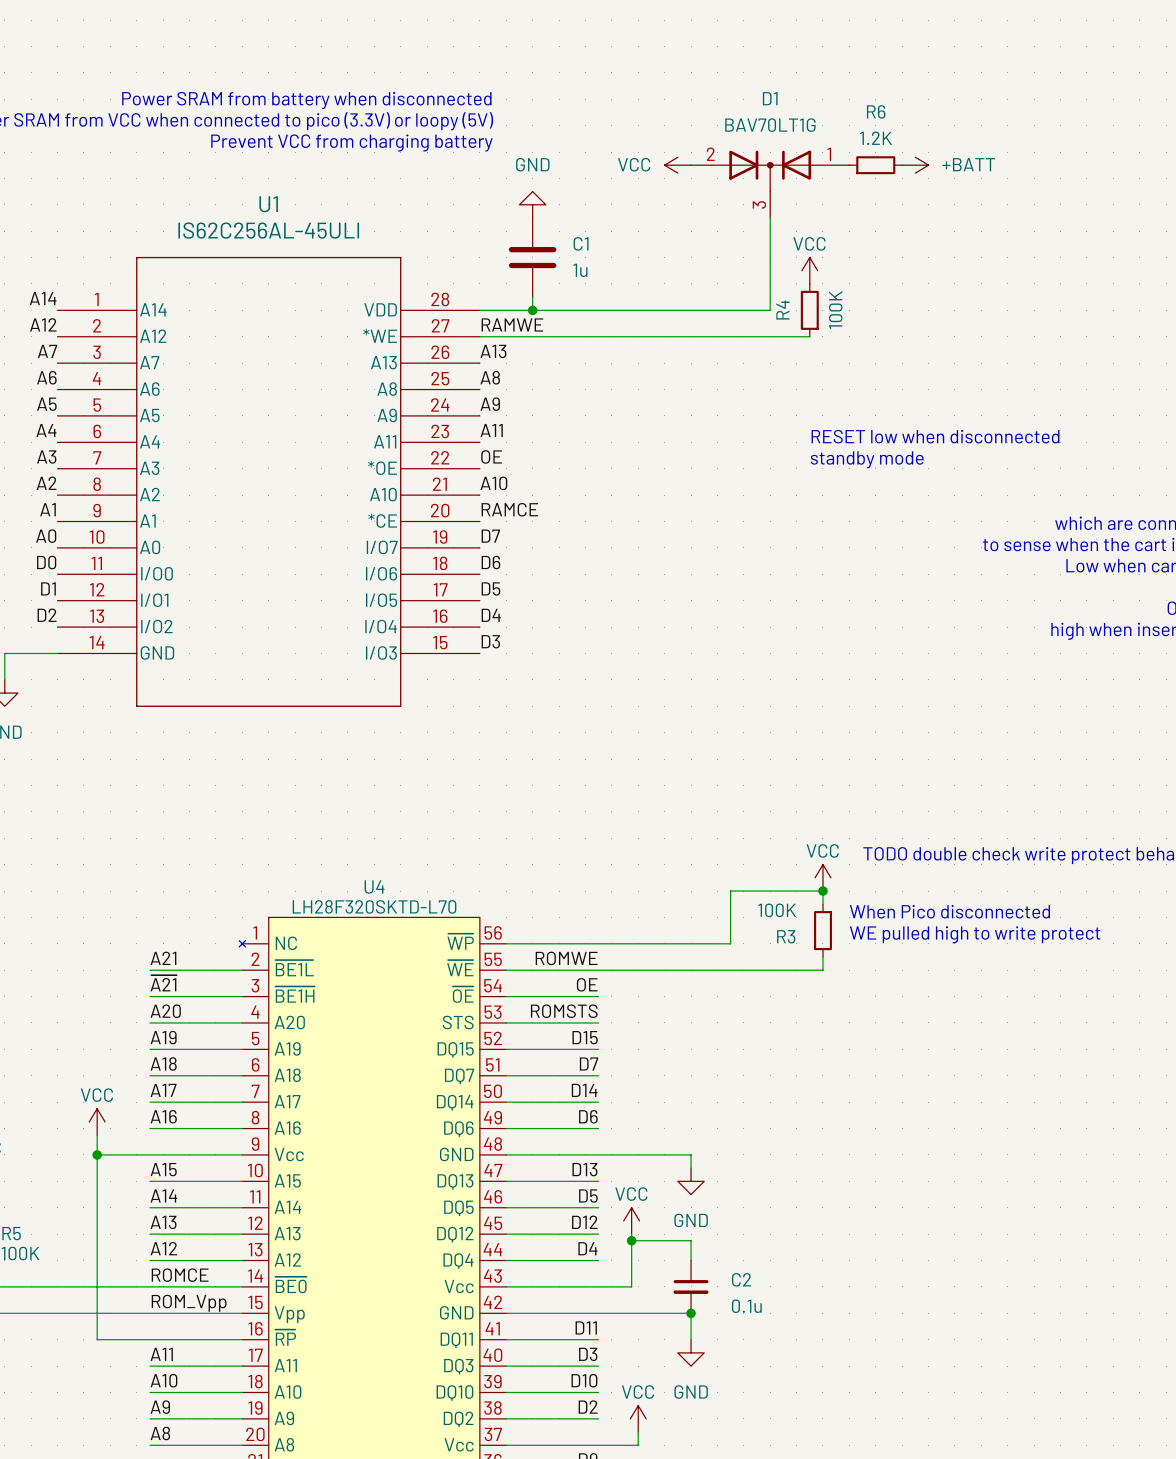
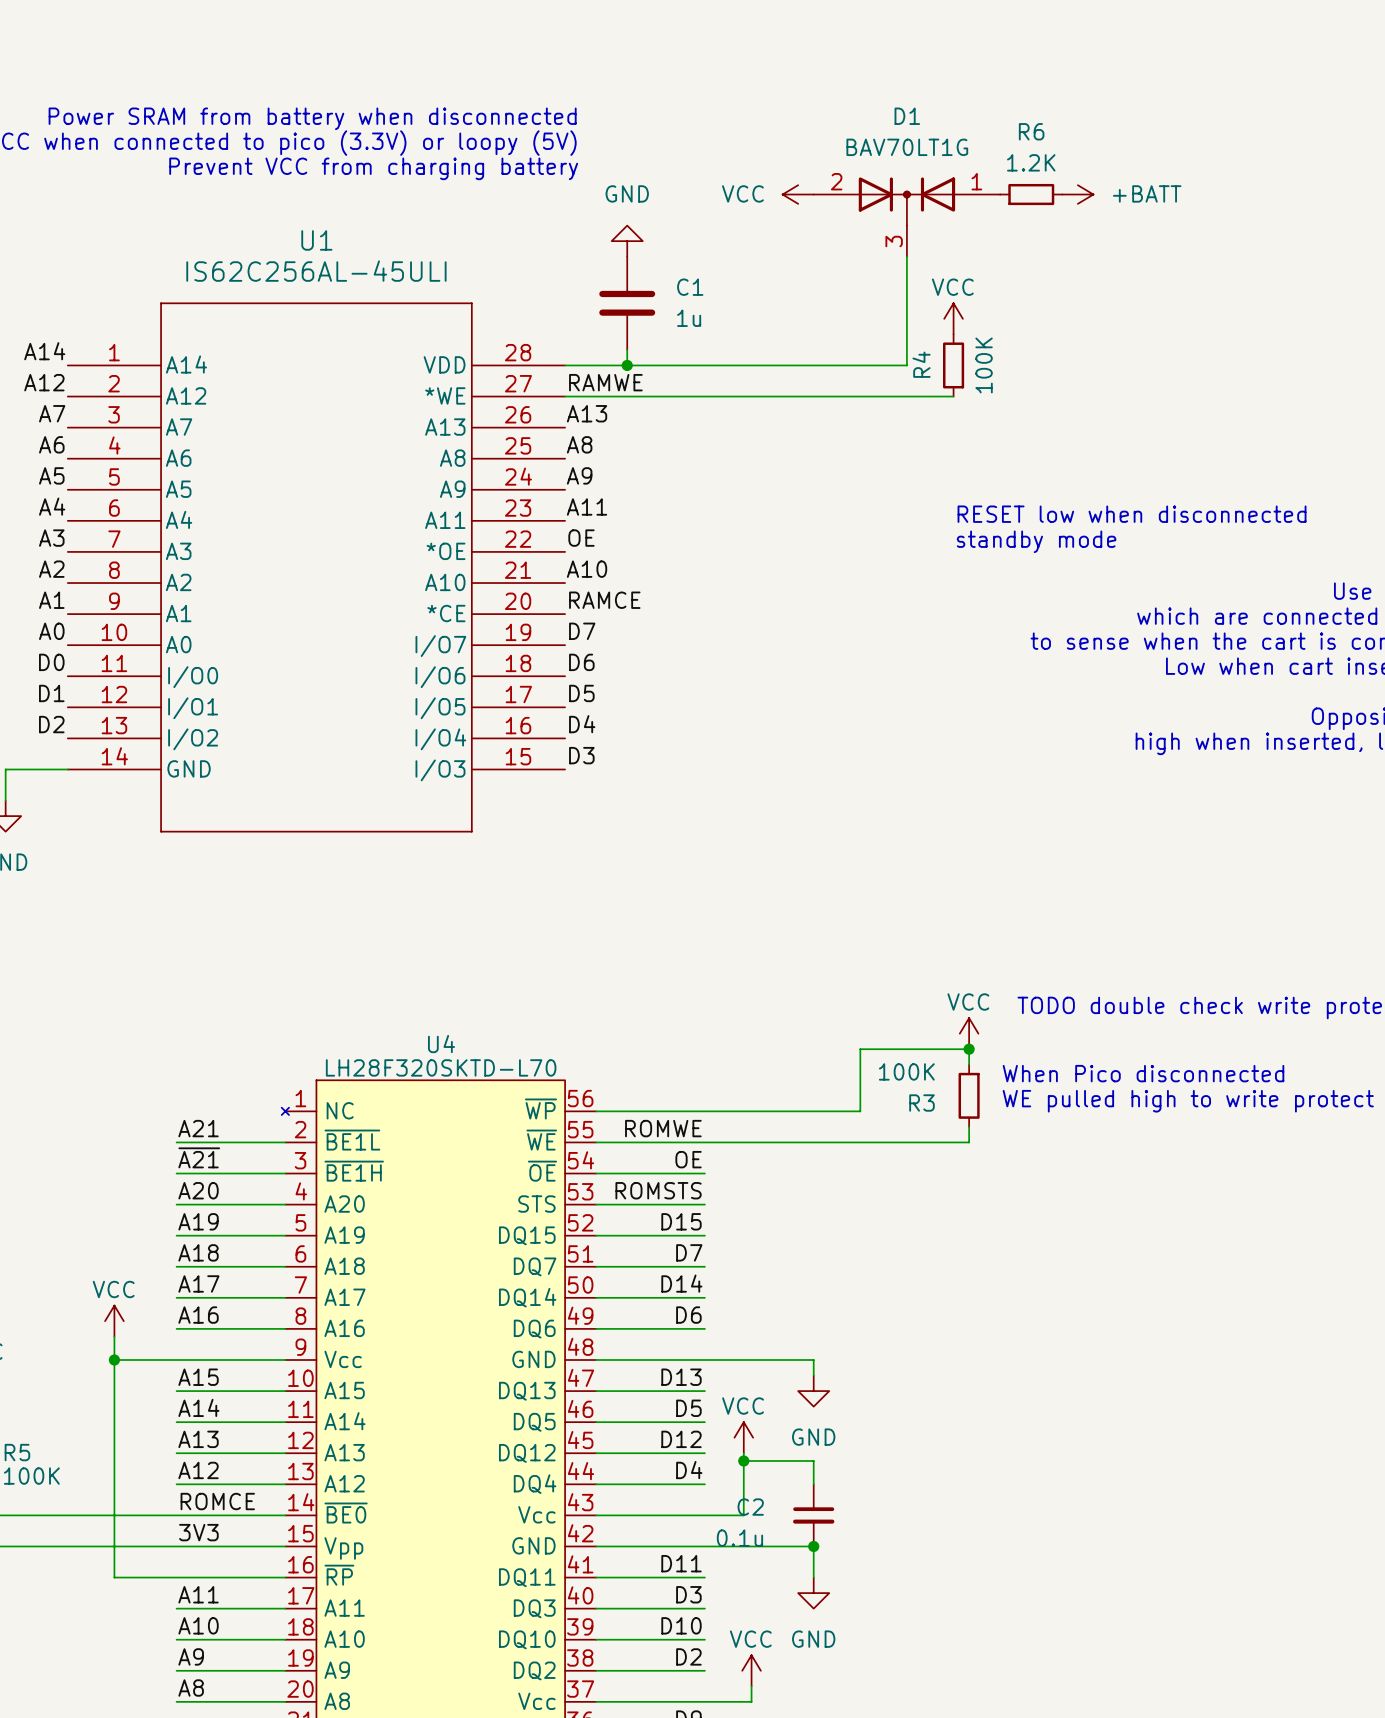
C2 name position: C2 (741, 1279) -> C2 (750, 1507)
label: ROM_Vpp (189, 1303) -> 3V3 (198, 1532)
C2 value position: 0.1u (746, 1306) -> 0.1u (739, 1538)

